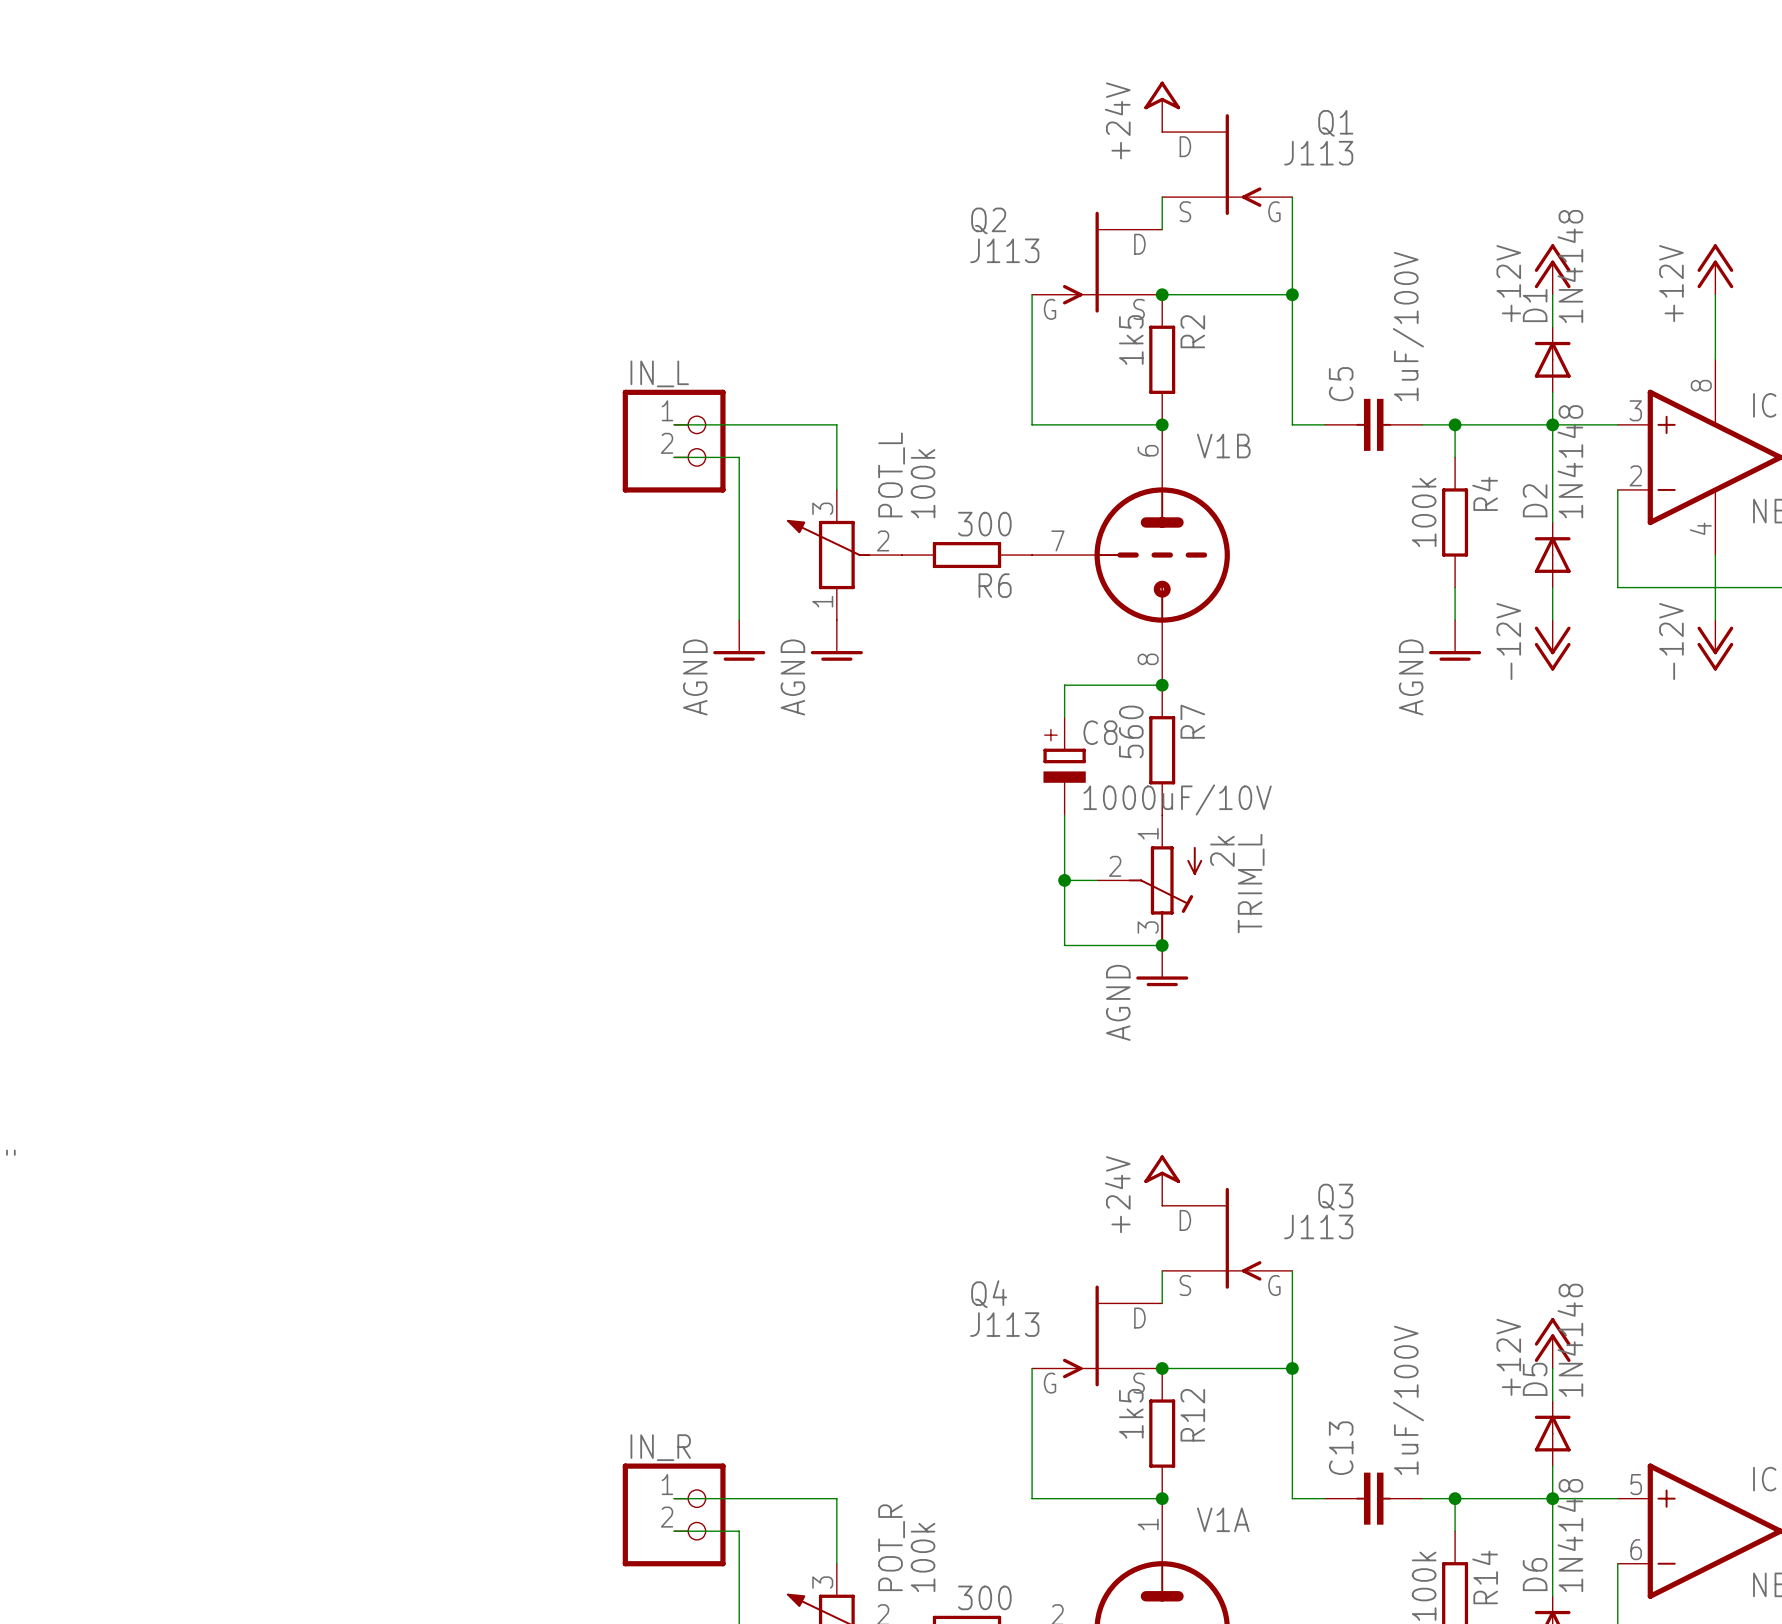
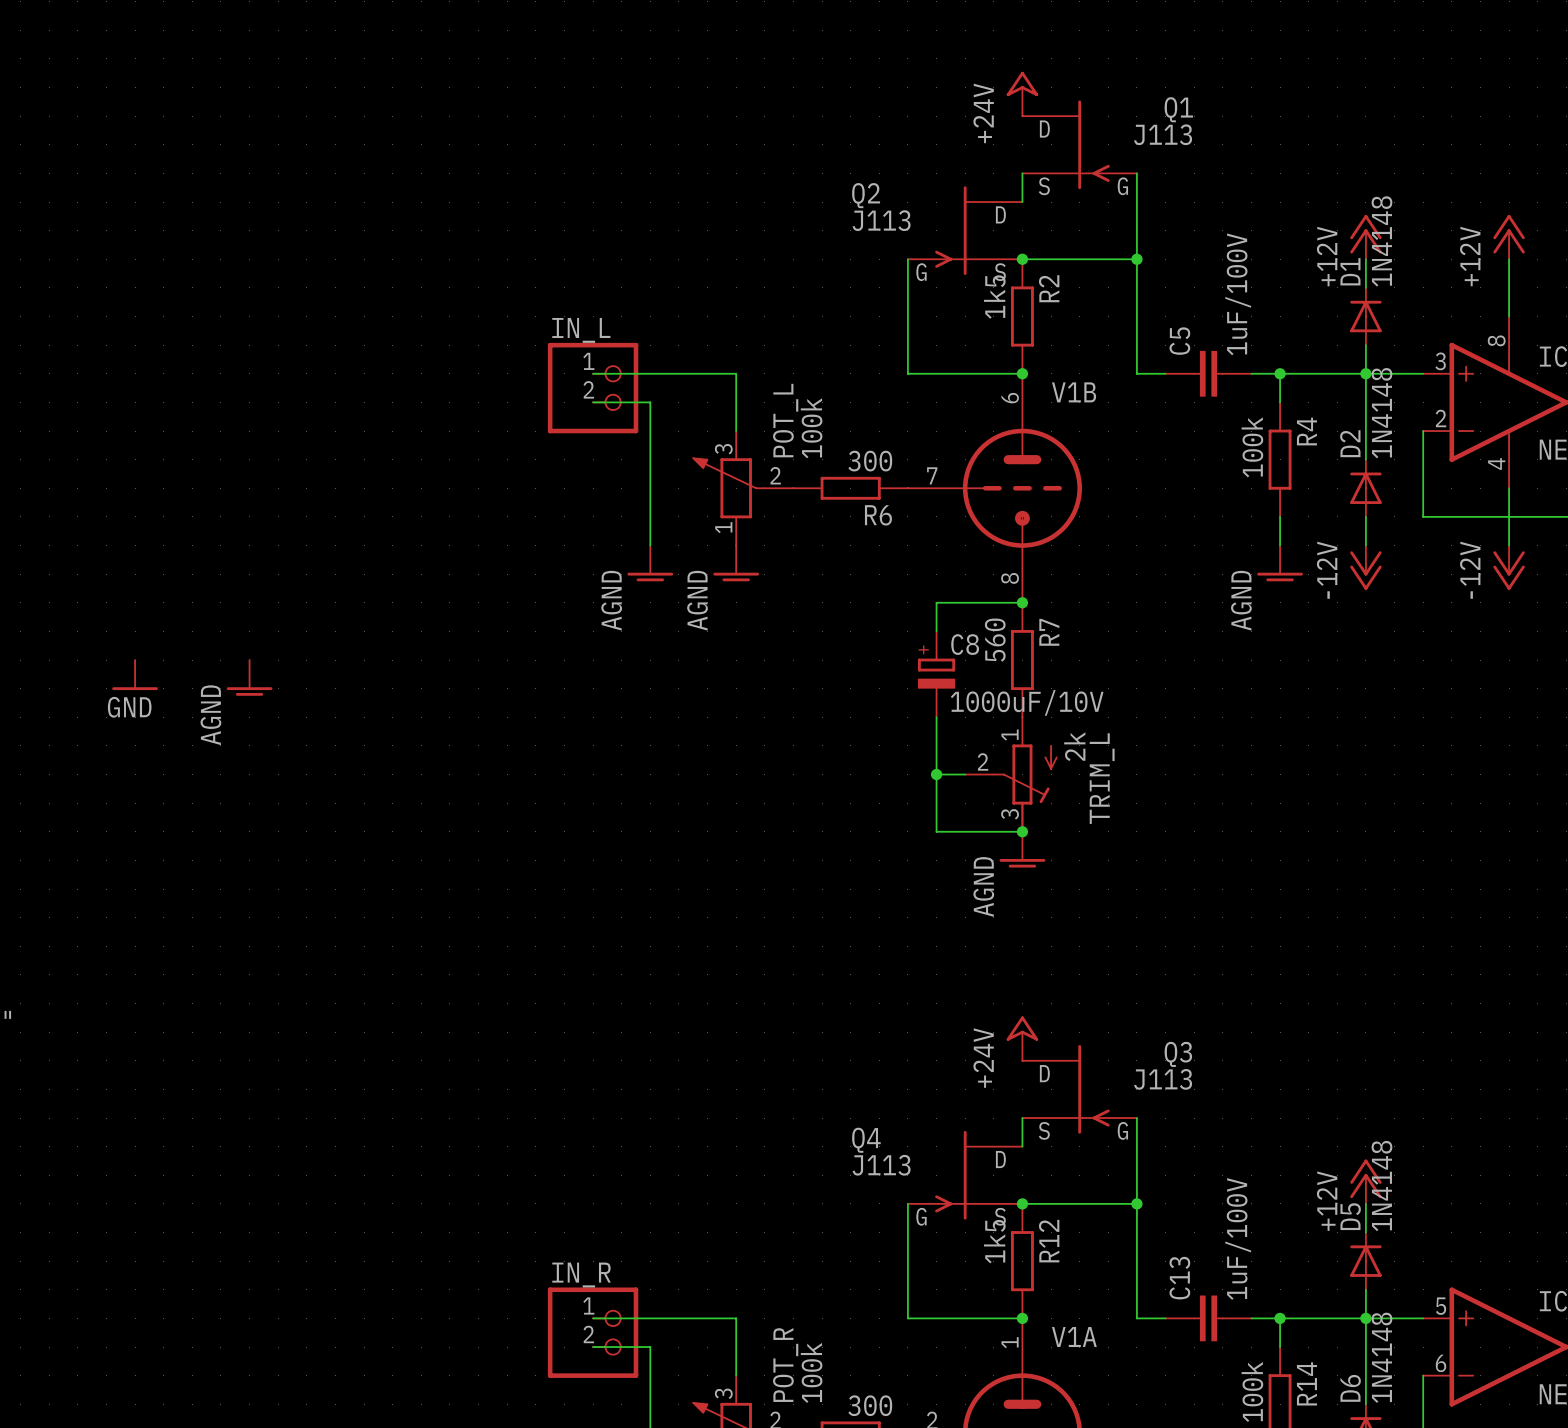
power symbol: none -> GND (135, 675)
power symbol: none -> AGND (249, 677)

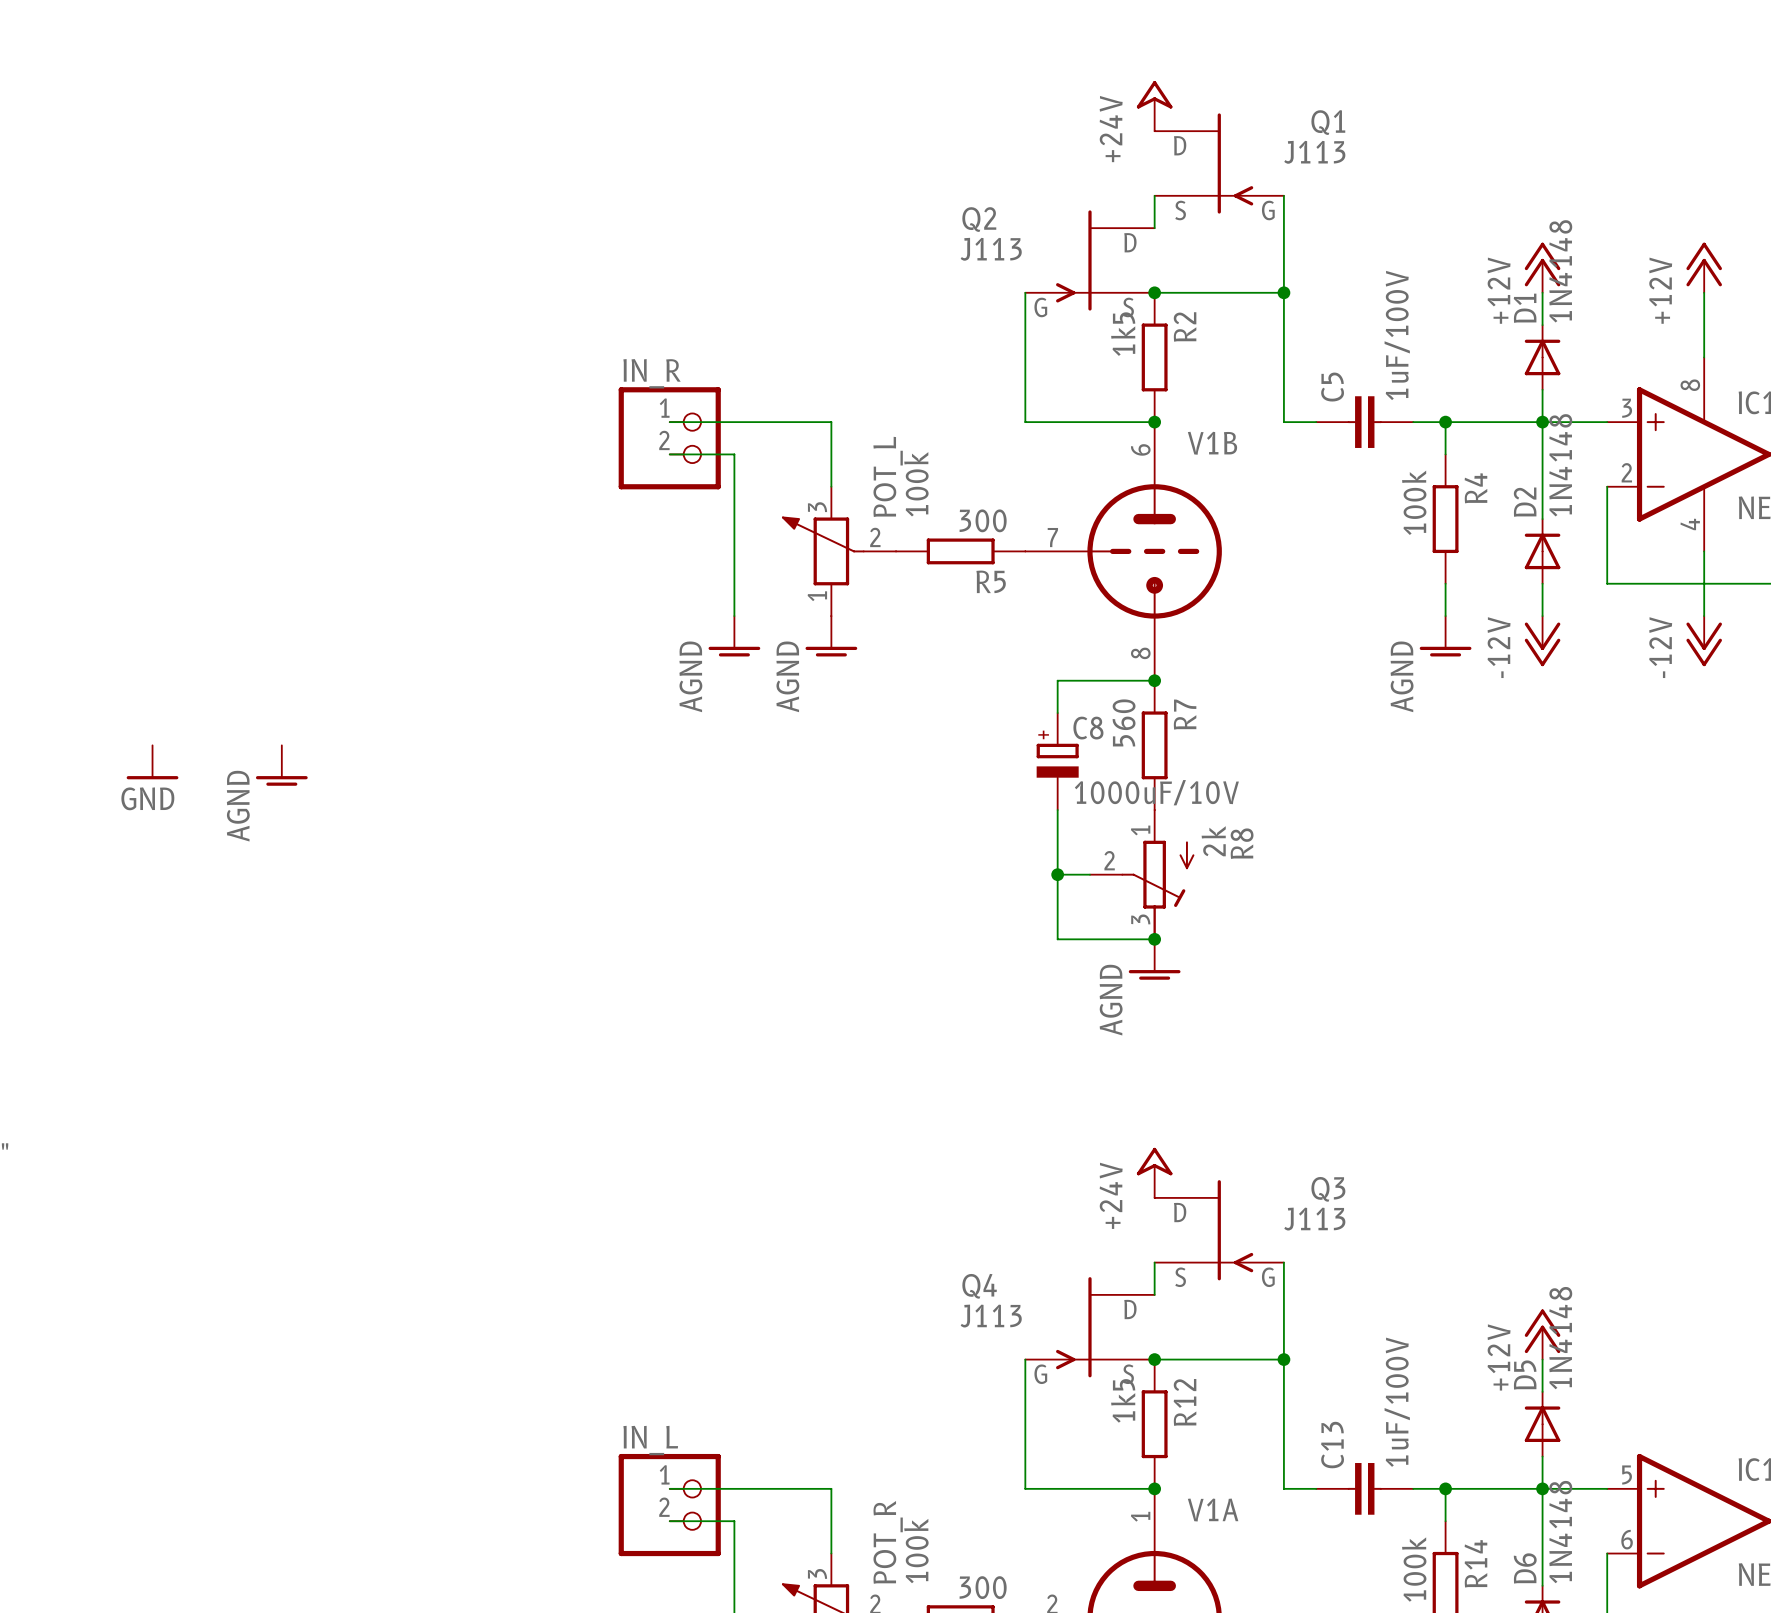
IN_L name: IN_L (581, 330) -> IN_R (652, 373)
R6 name: R6 (878, 515) -> R5 (991, 581)
TRIM_L name: TRIM_L (1102, 778) -> R8 (1242, 843)
IN_R name: IN_R (581, 1275) -> IN_L (650, 1440)

